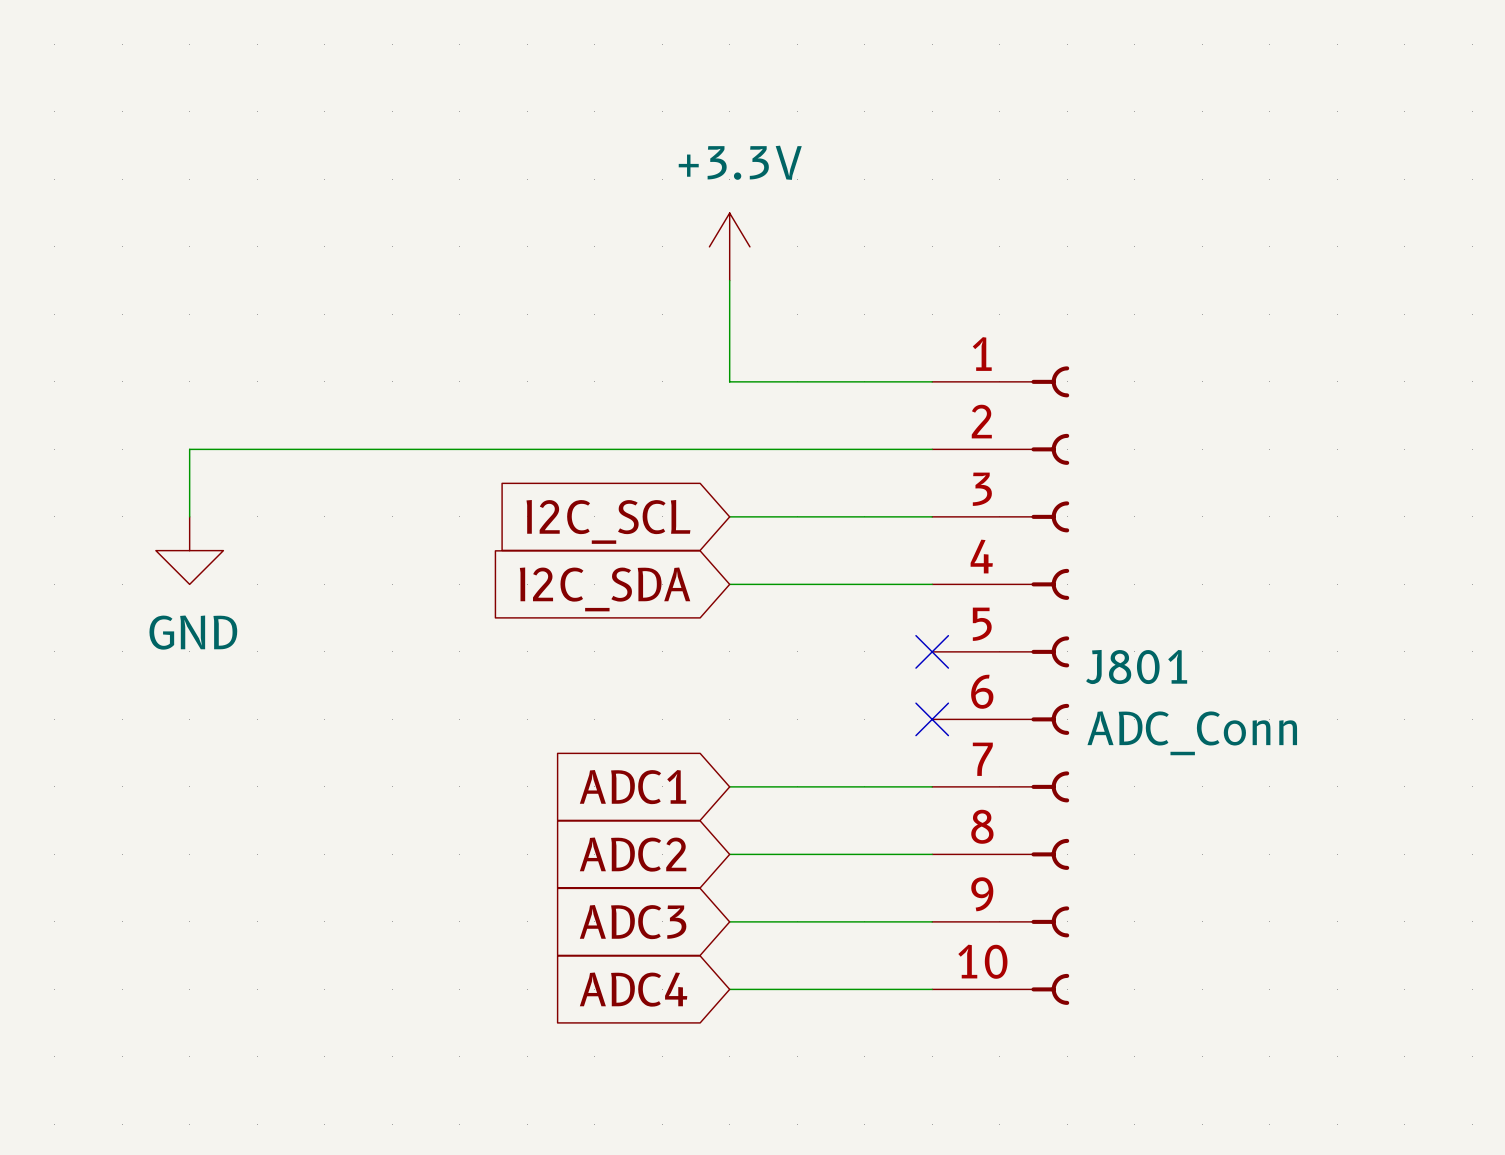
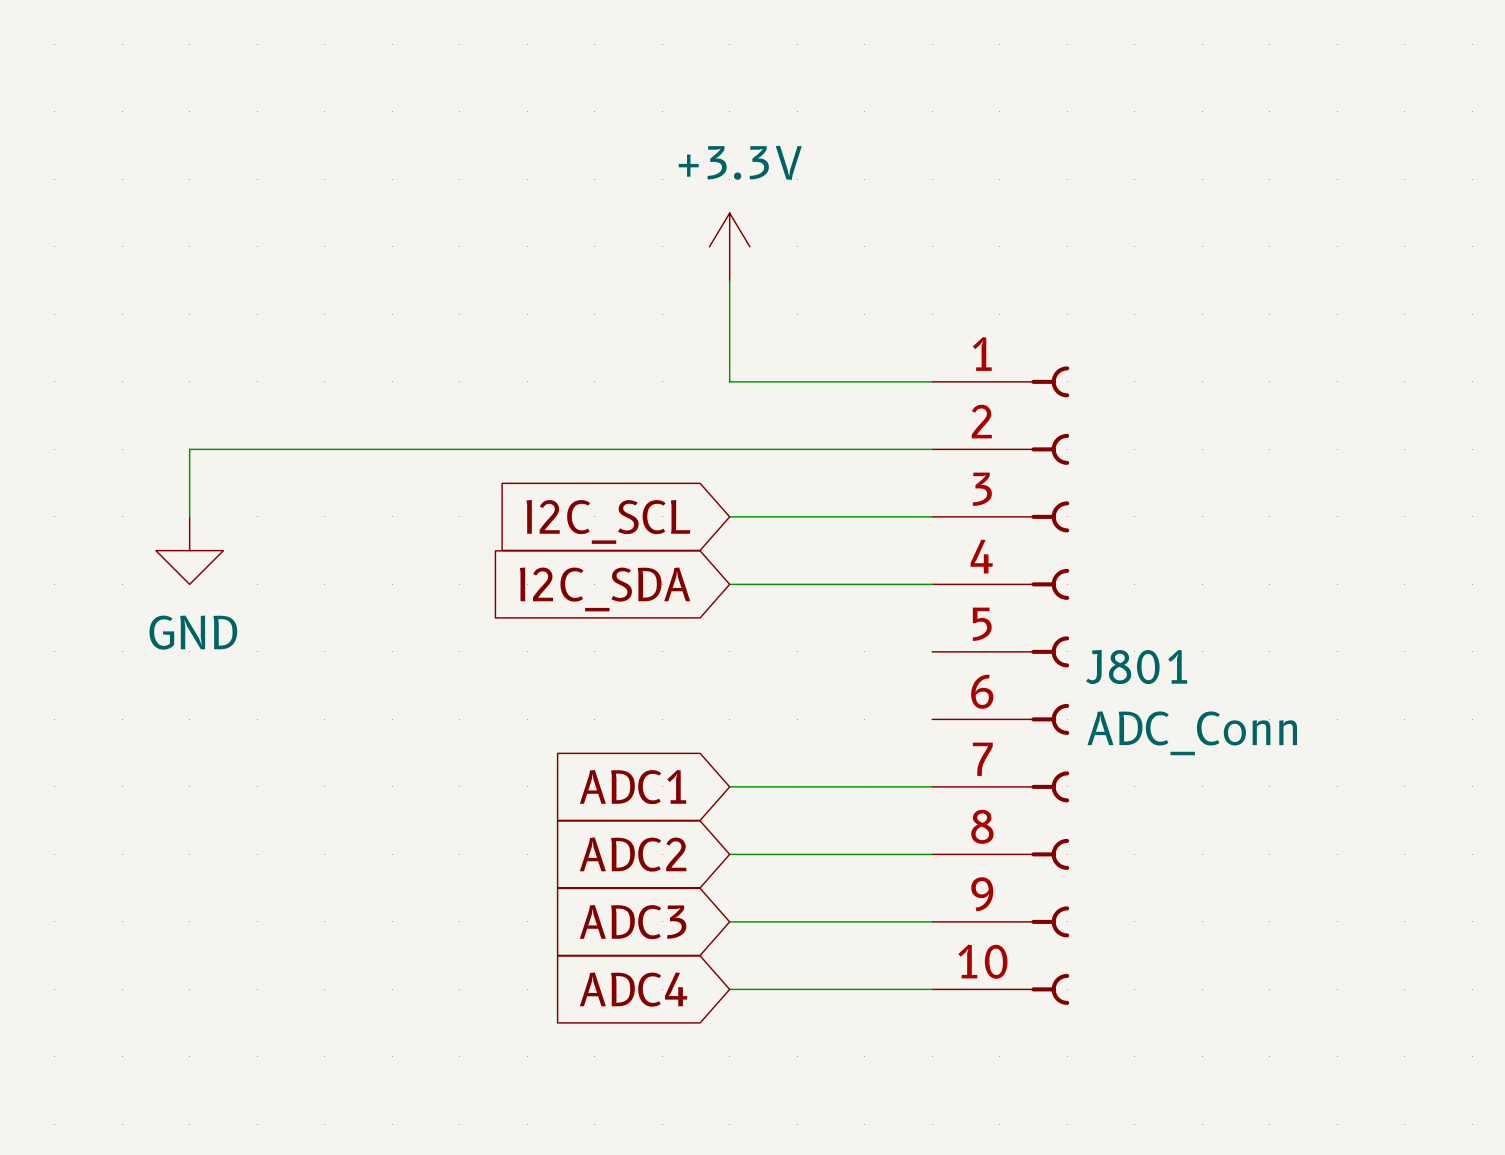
no-connect mark: (932, 651) -> none
no-connect mark: (932, 719) -> none

